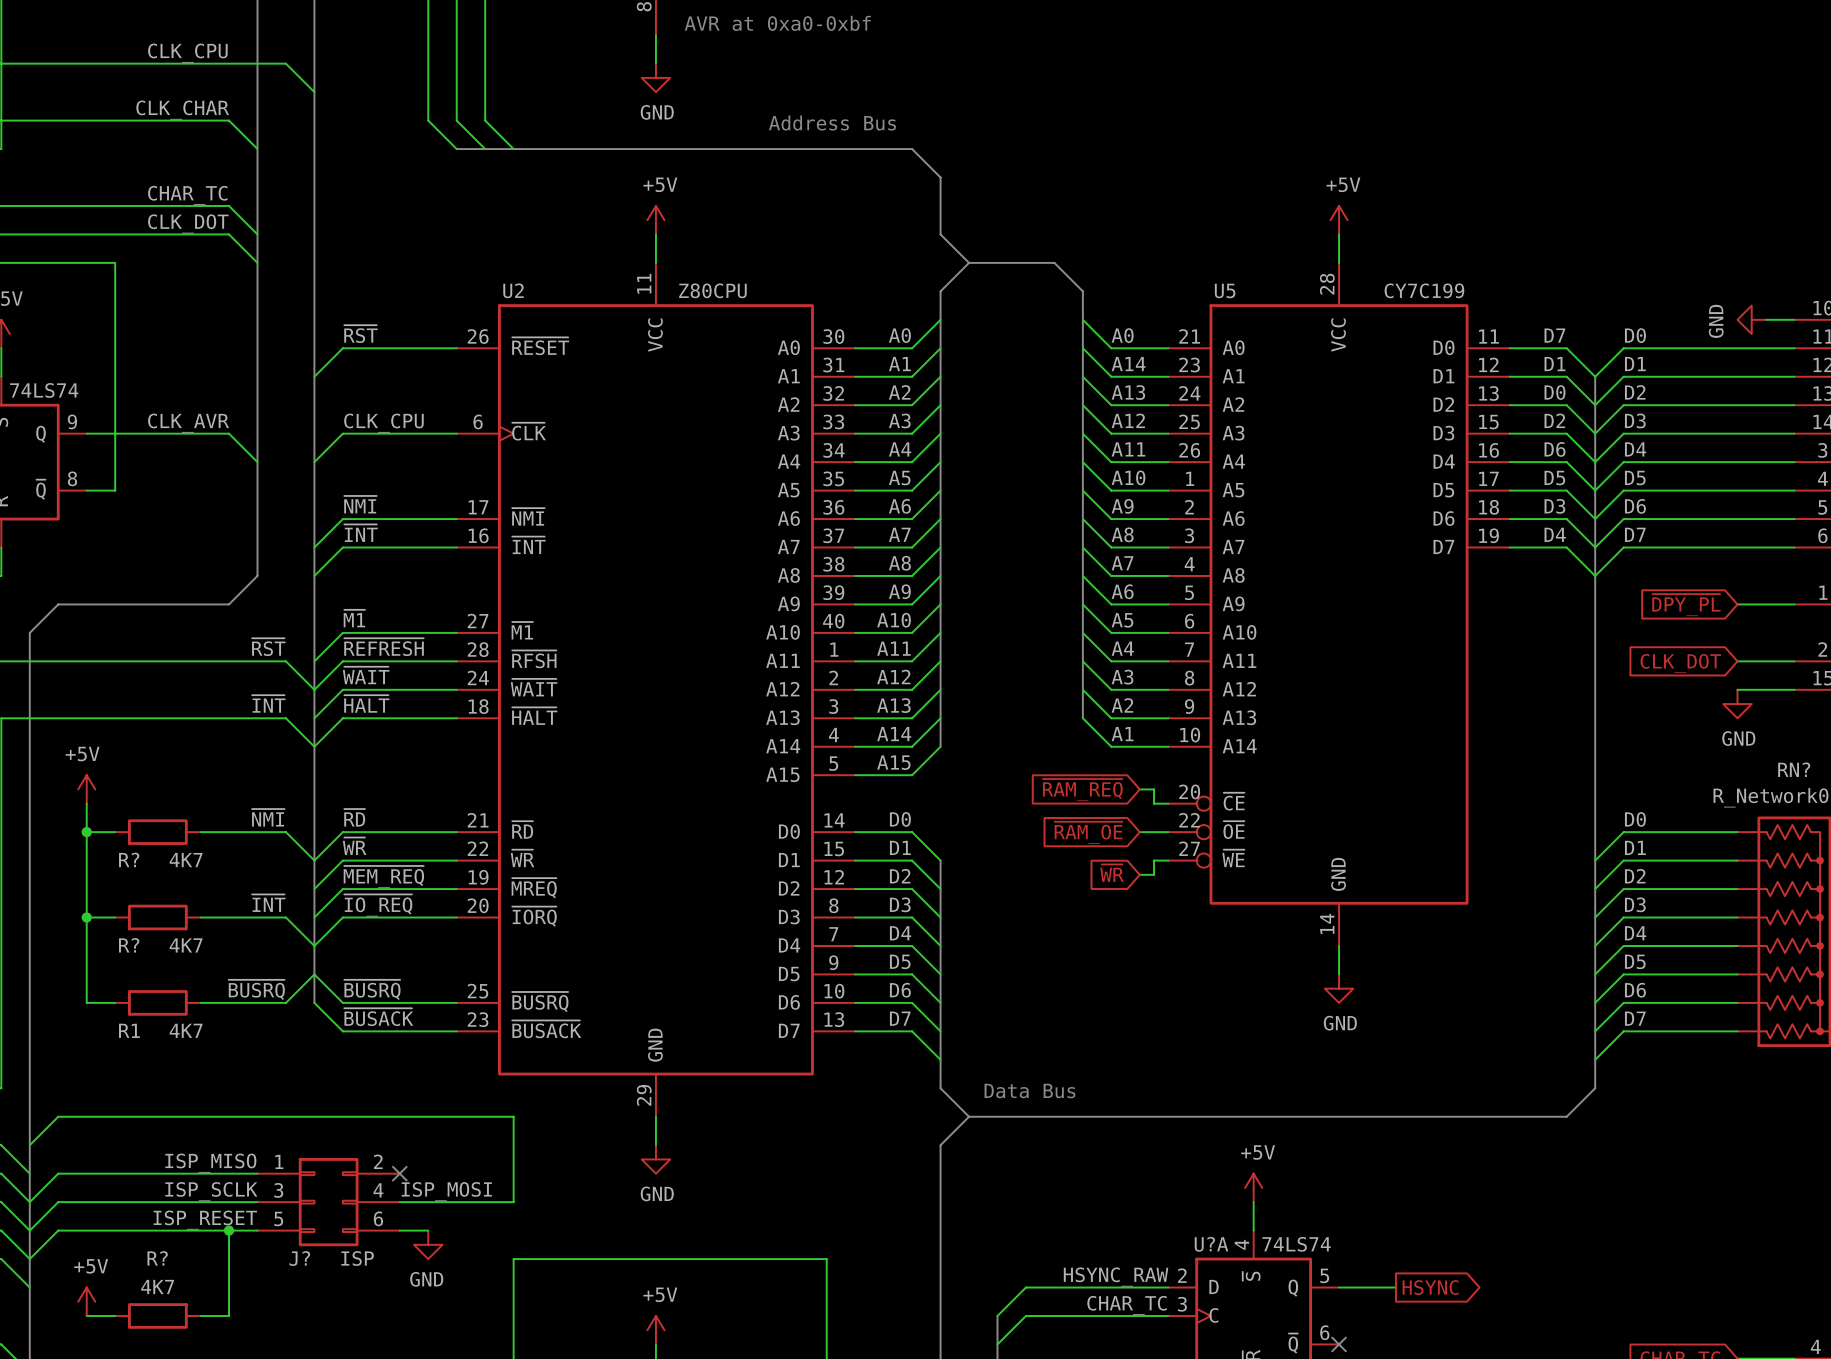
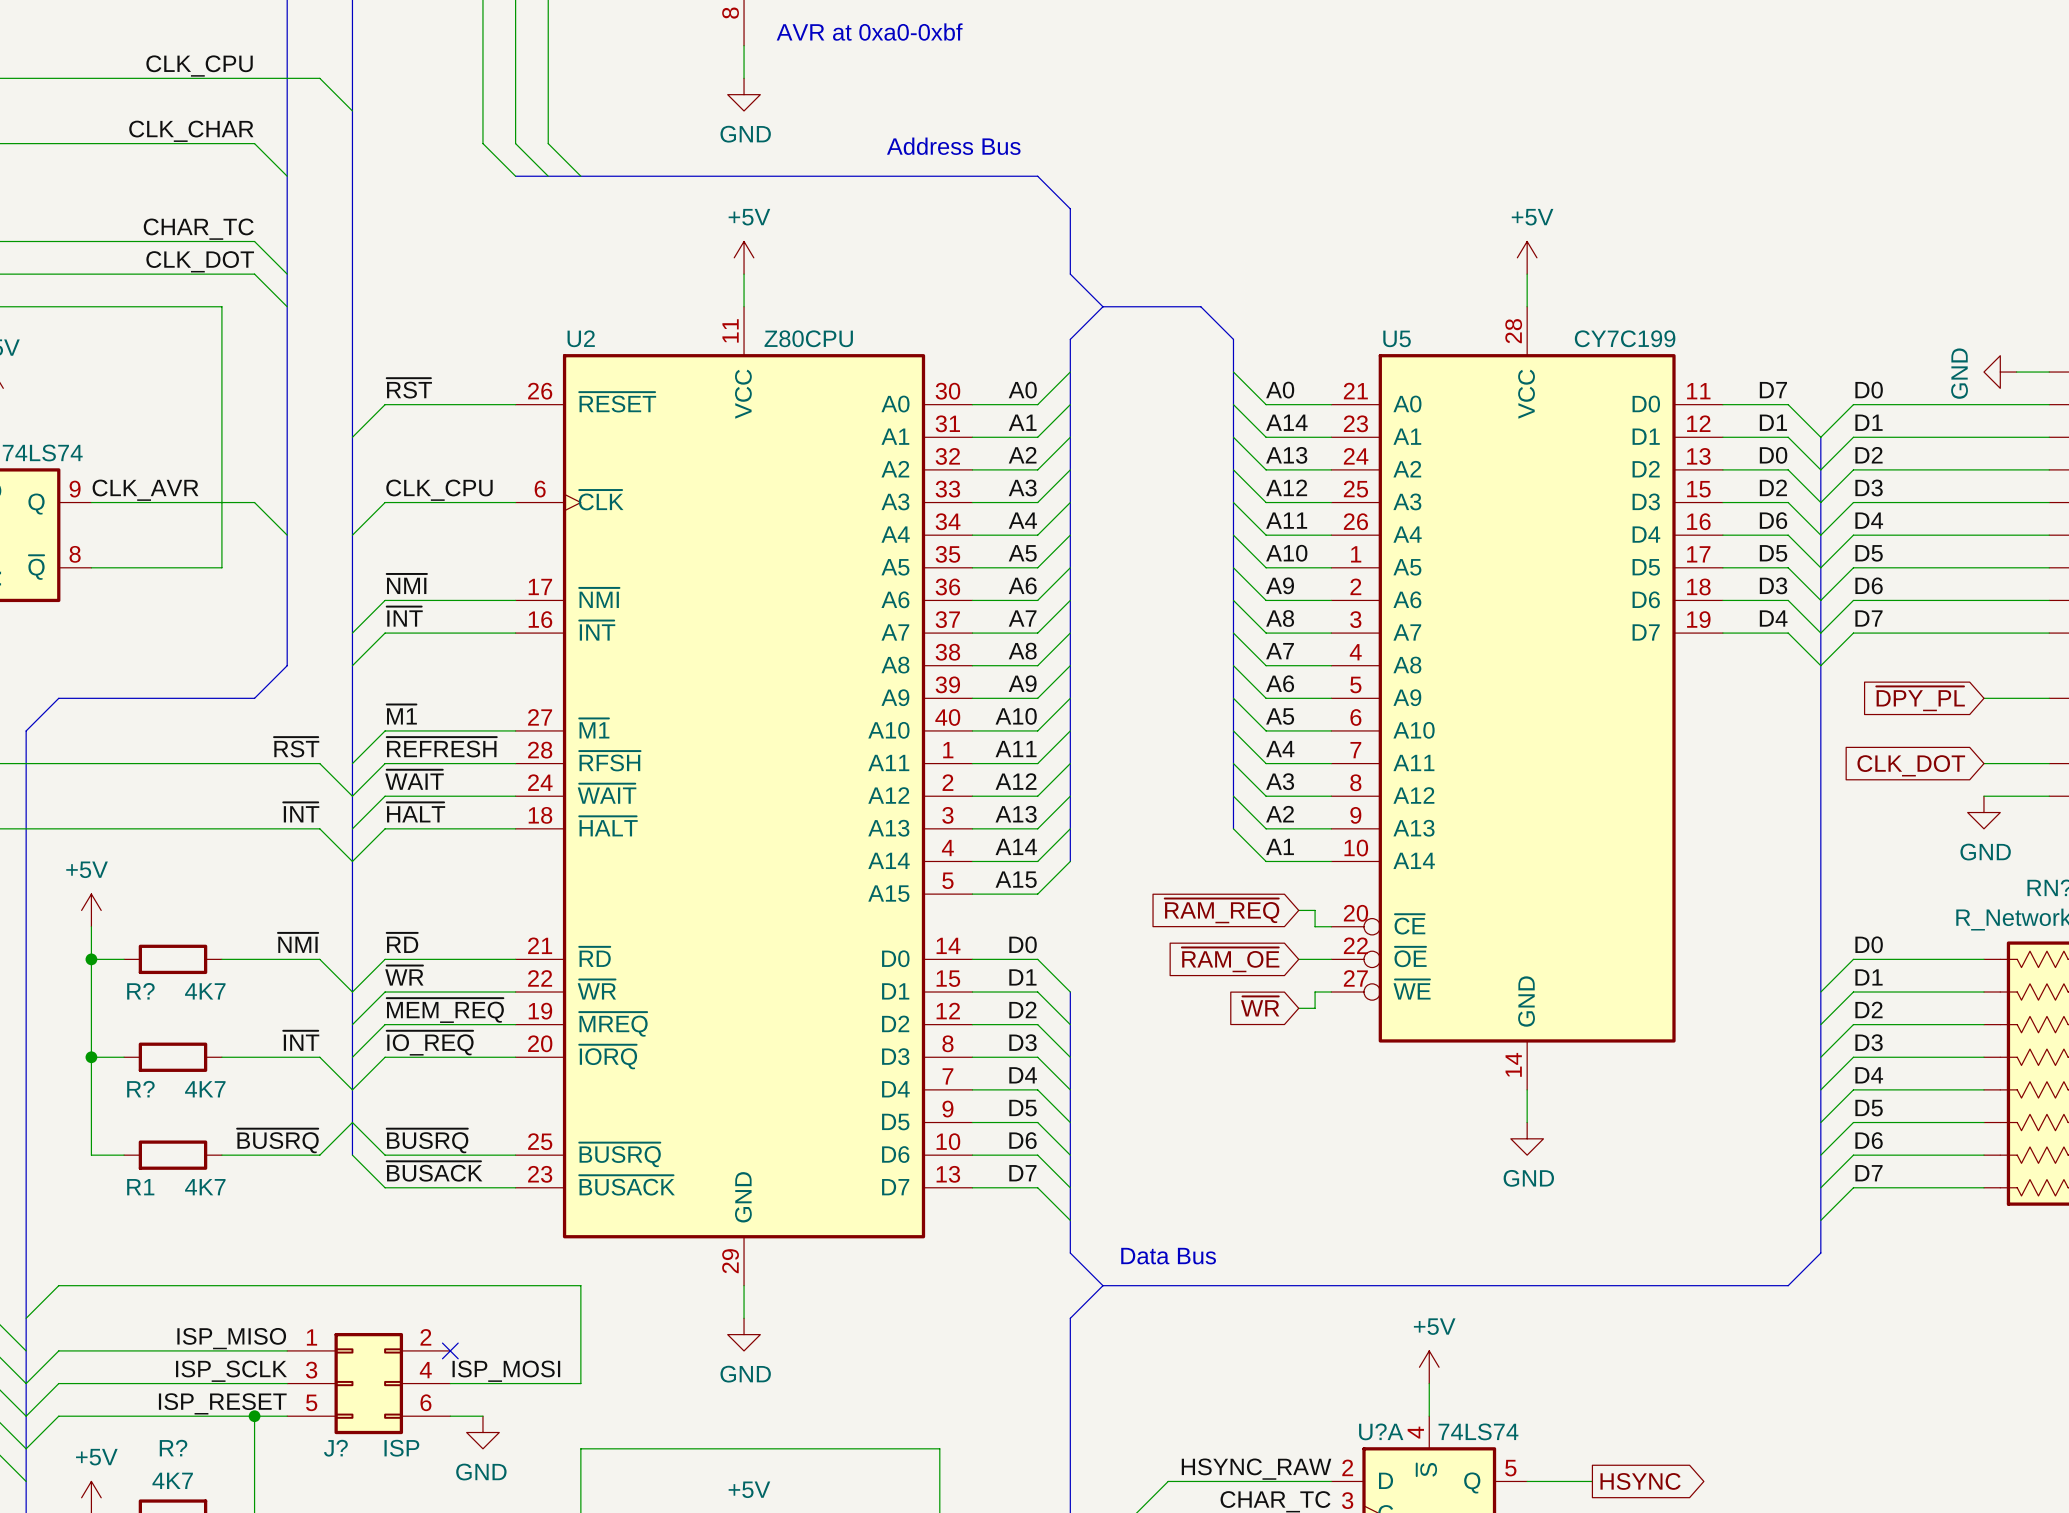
wire: (115, 262) (115, 490) -> (124, 306) (221, 306) (221, 567) (124, 567)
label position: CLK_AVR (188, 423) -> CLK_AVR (145, 490)

